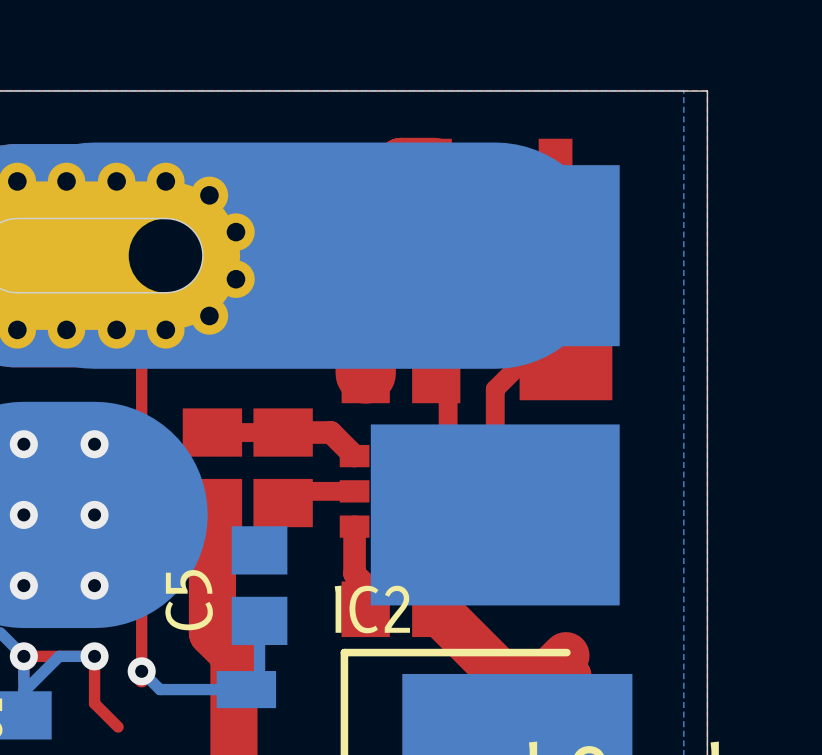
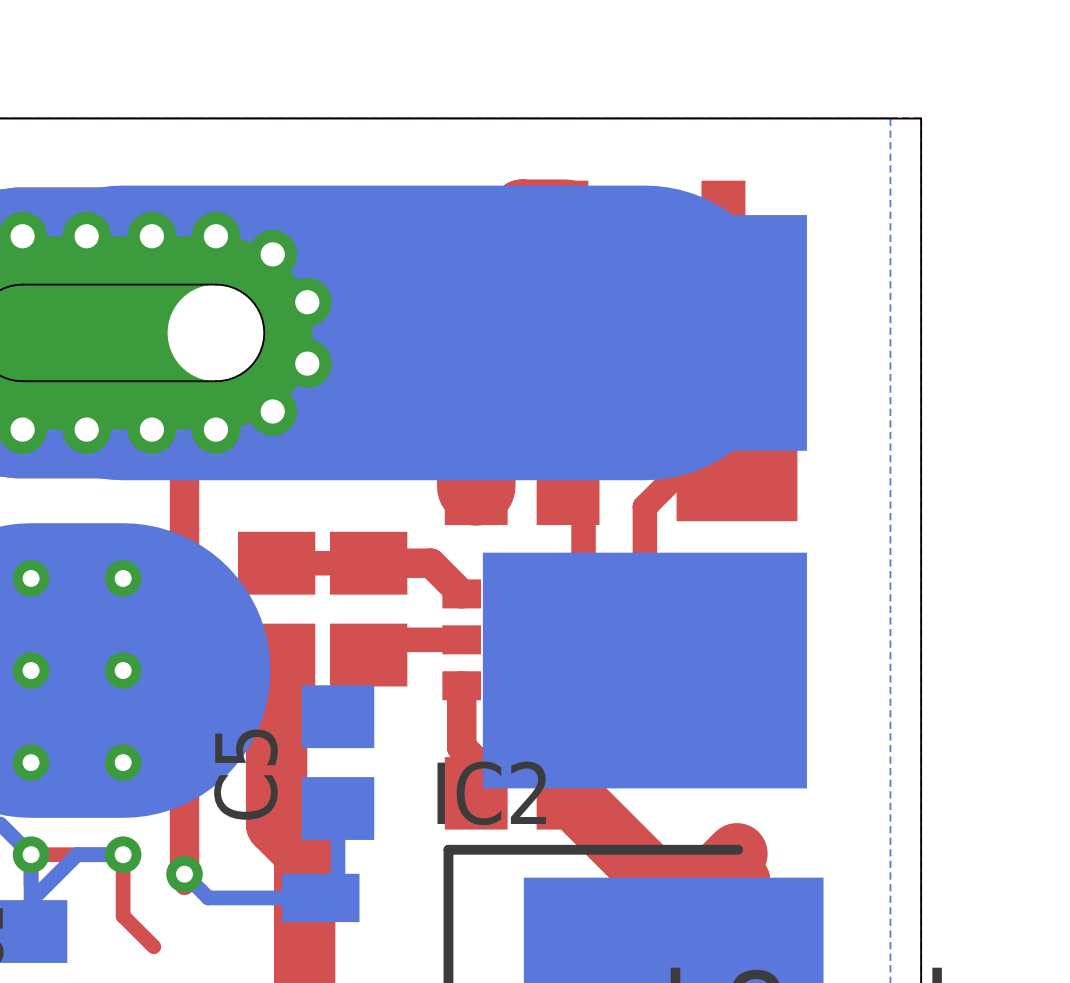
top track width: thin (141, 255) (141, 671) -> thick (184, 332) (184, 874)

